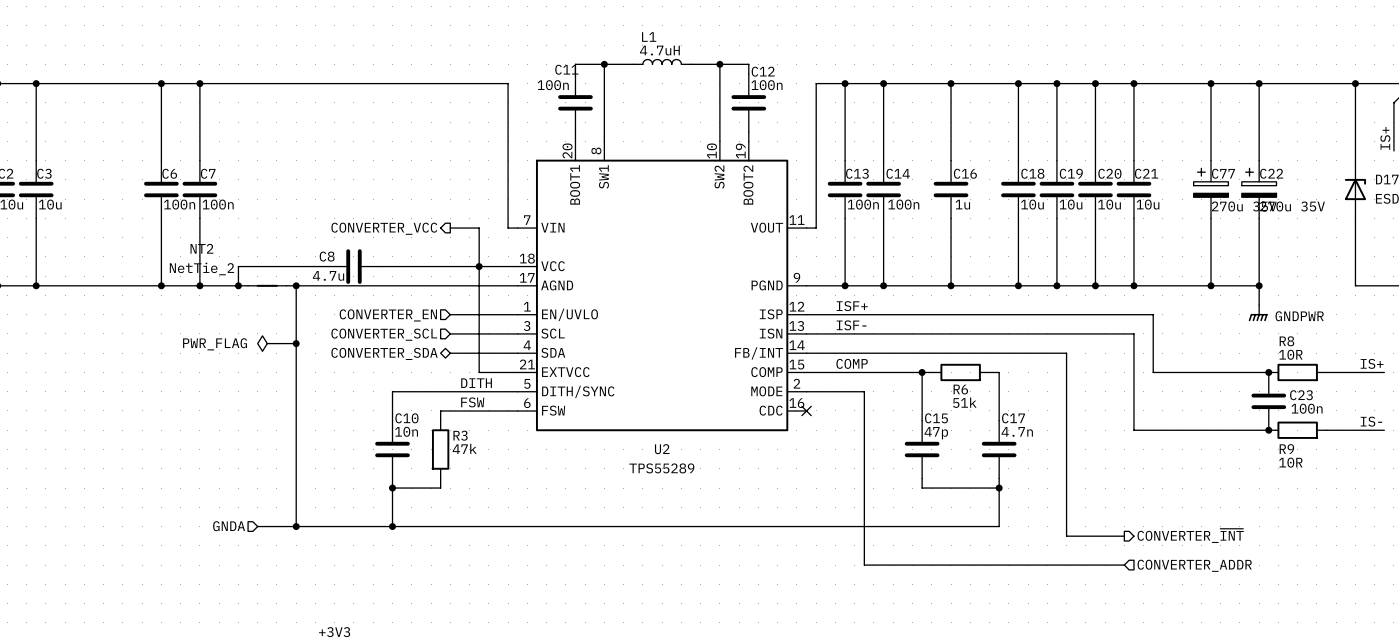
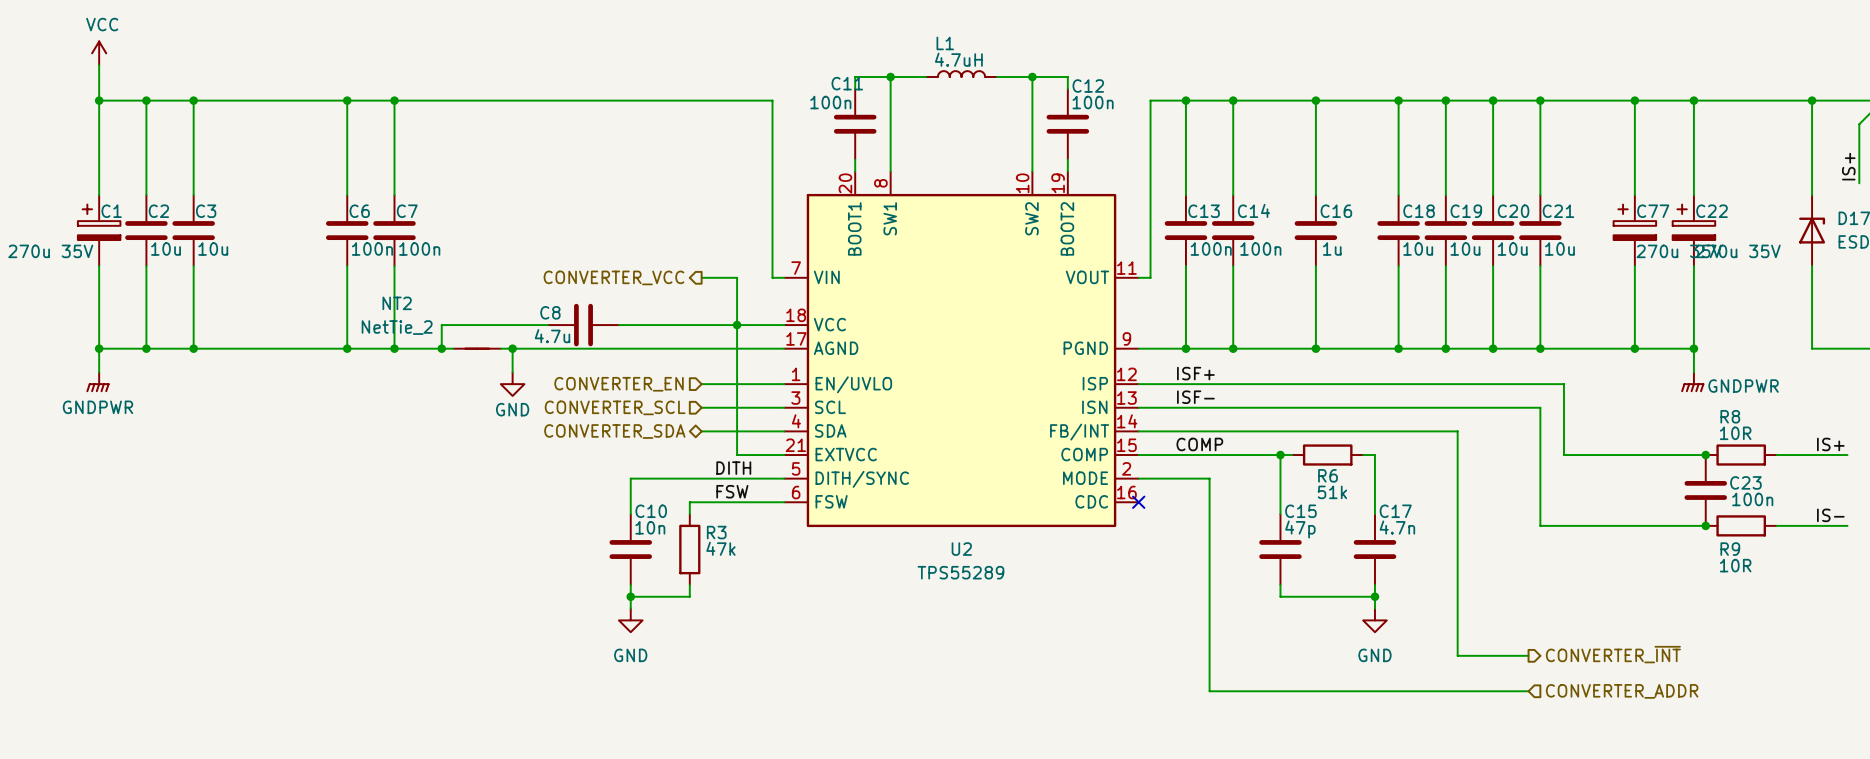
wire: (296, 305) (296, 526) -> none
power symbol: none -> GND (512, 384)
power symbol: PWR_FLAG (267, 343) -> none
wire: (276, 343) (296, 343) -> none
junction: (296, 343) -> none
wire: (392, 497) (392, 526) -> none
wire: (999, 497) (999, 526) (257, 526) -> none
power symbol: none -> GND (630, 620)
power symbol: none -> GND (1374, 620)
hierarchical label: GNDA (229, 526) -> none
junction: (296, 526) -> none
junction: (392, 526) -> none

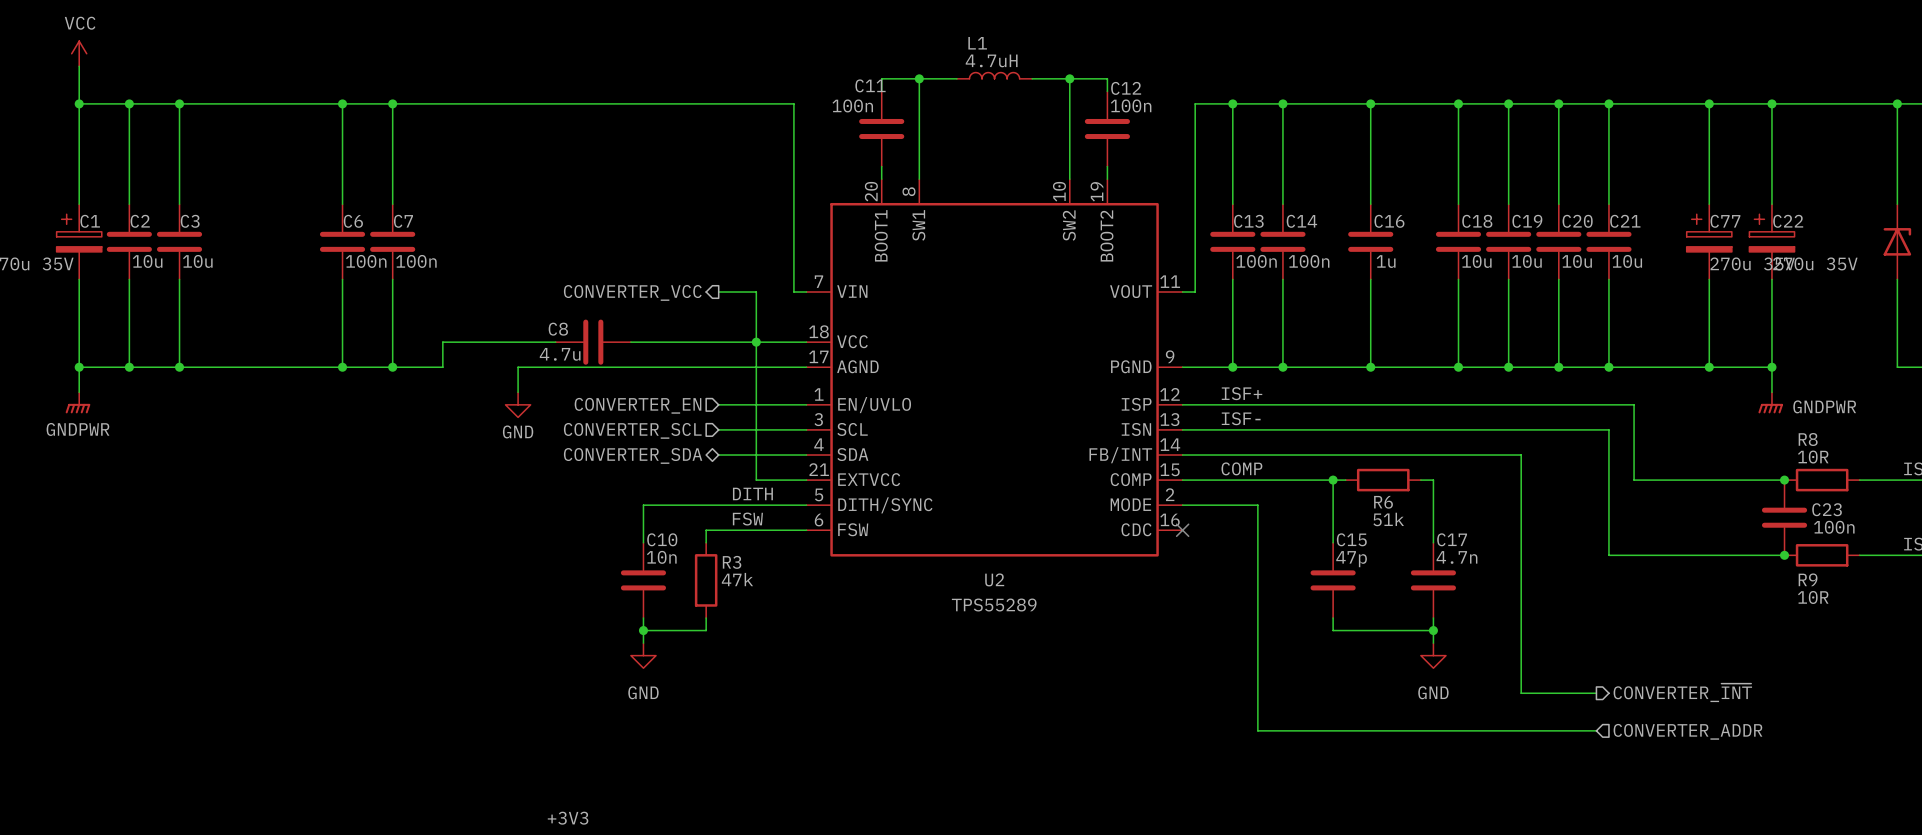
wire: (441, 348) (453, 348) -> none
junction: (441, 348) -> none
NT2: NetTie_2 (477, 348) -> none
wire: (500, 348) (512, 348) -> none
junction: (512, 348) -> none

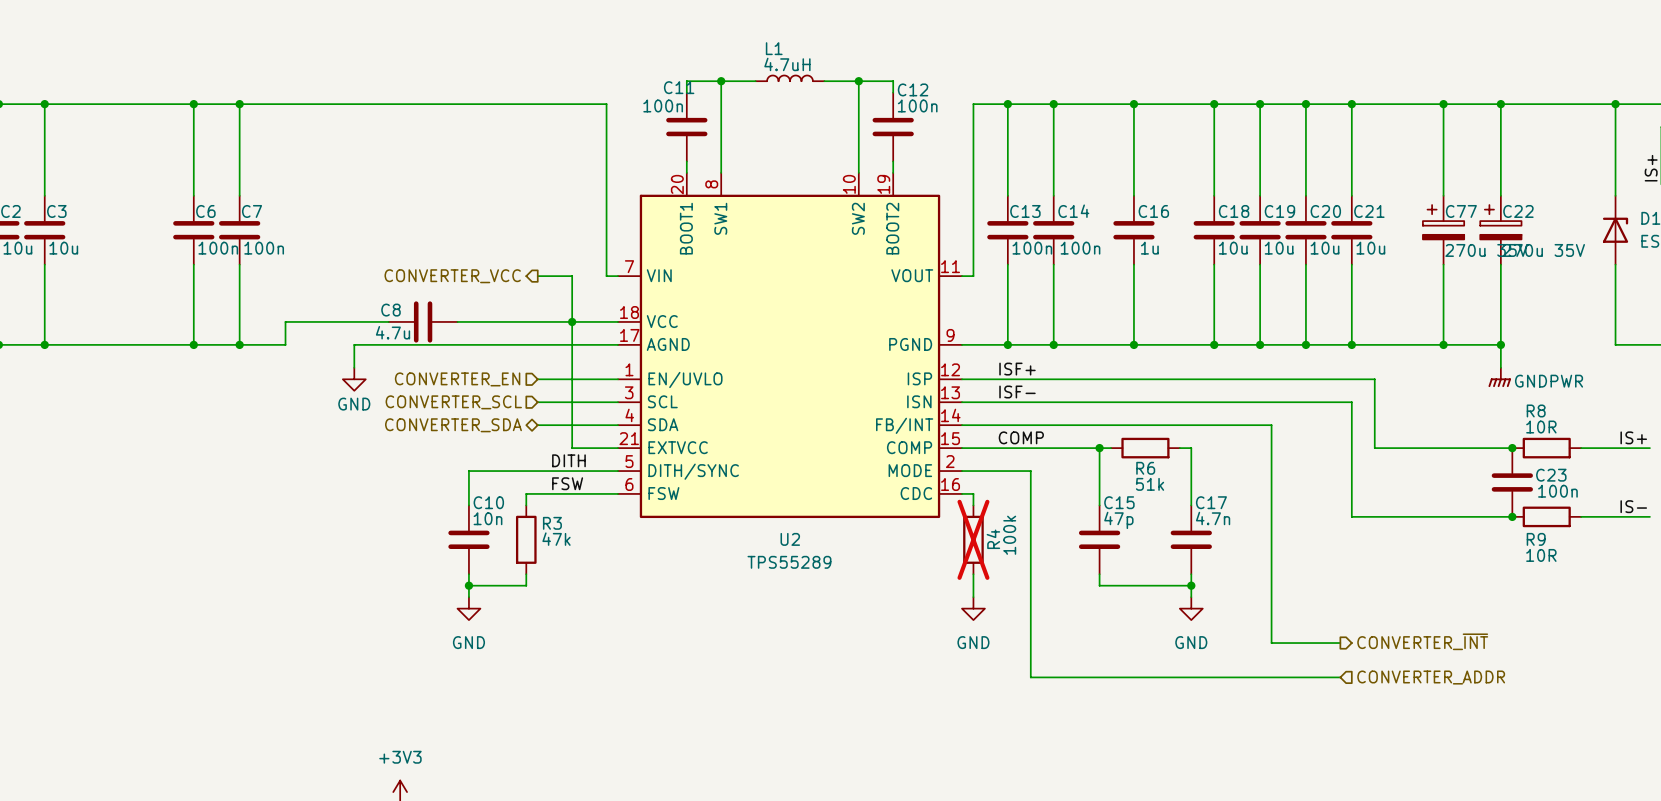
wire: none -> (961, 493) (973, 493) (973, 505)
no-connect mark: (1182, 530) -> none
R4: none -> 100k (973, 539)
wire: none -> (973, 574) (973, 597)
power symbol: none -> GND (973, 608)

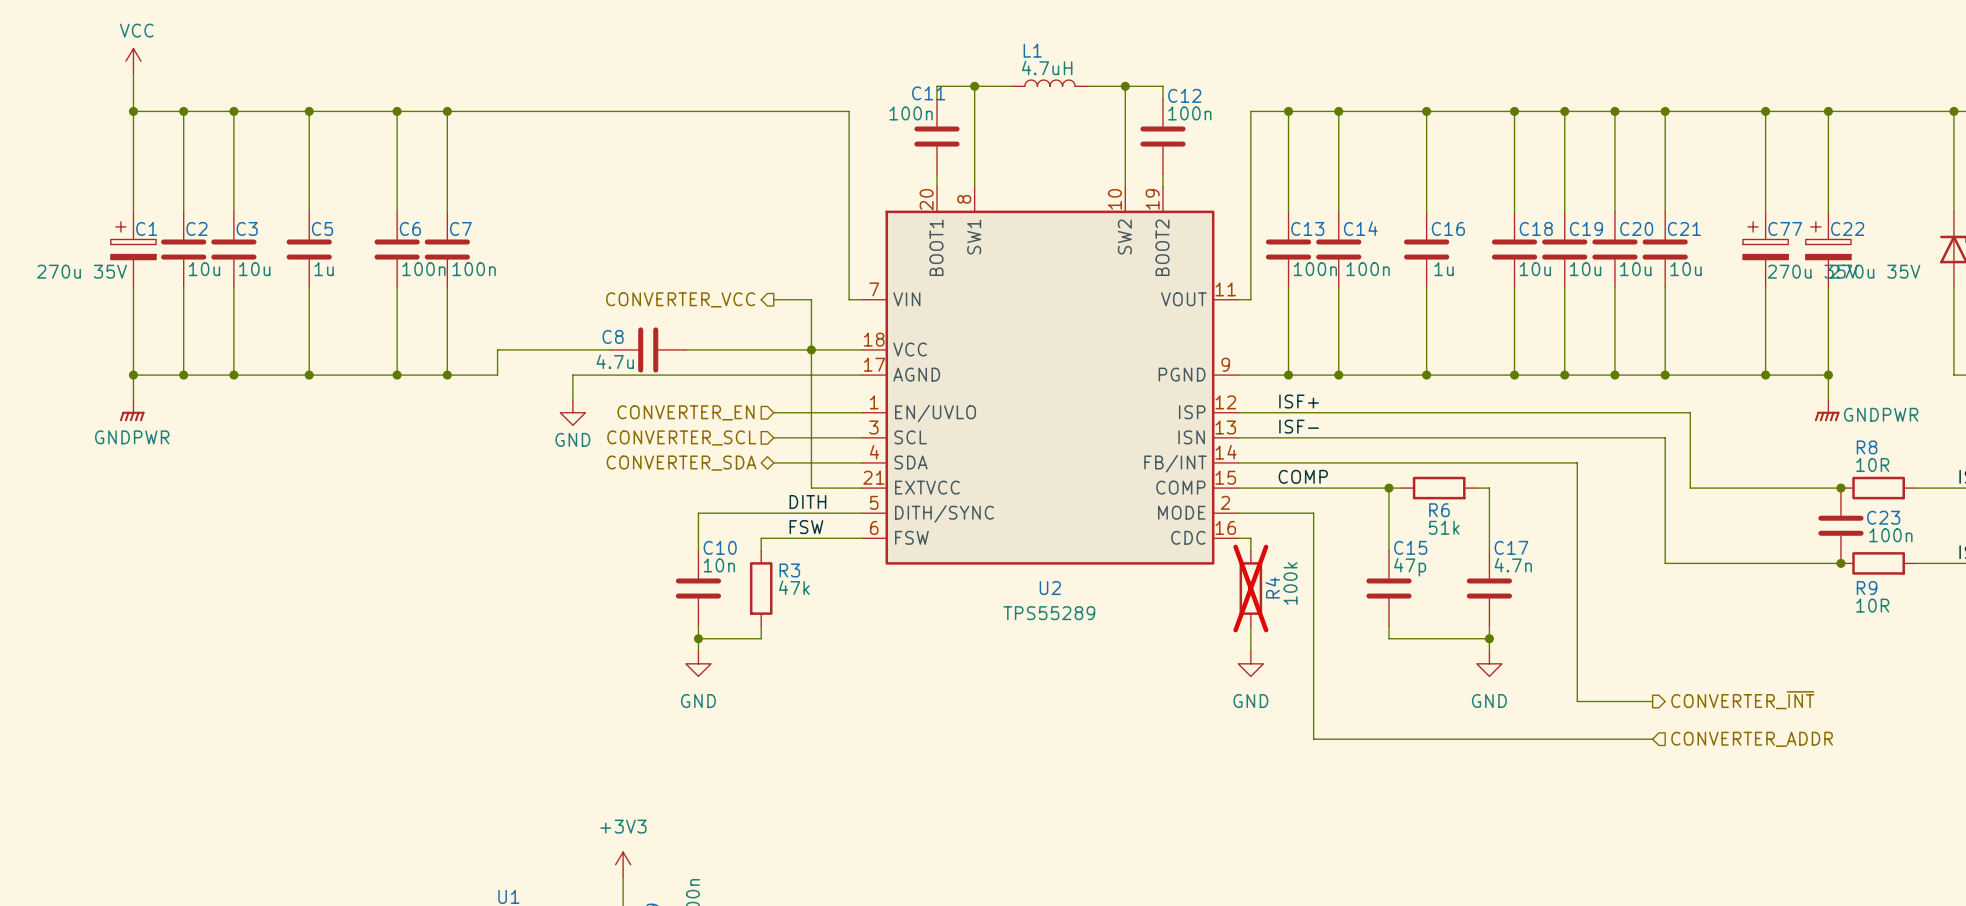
wire: none -> (309, 111) (309, 211)
junction: none -> (309, 111)
C5: none -> 1u (309, 249)
wire: none -> (309, 287) (309, 375)
junction: none -> (309, 375)

